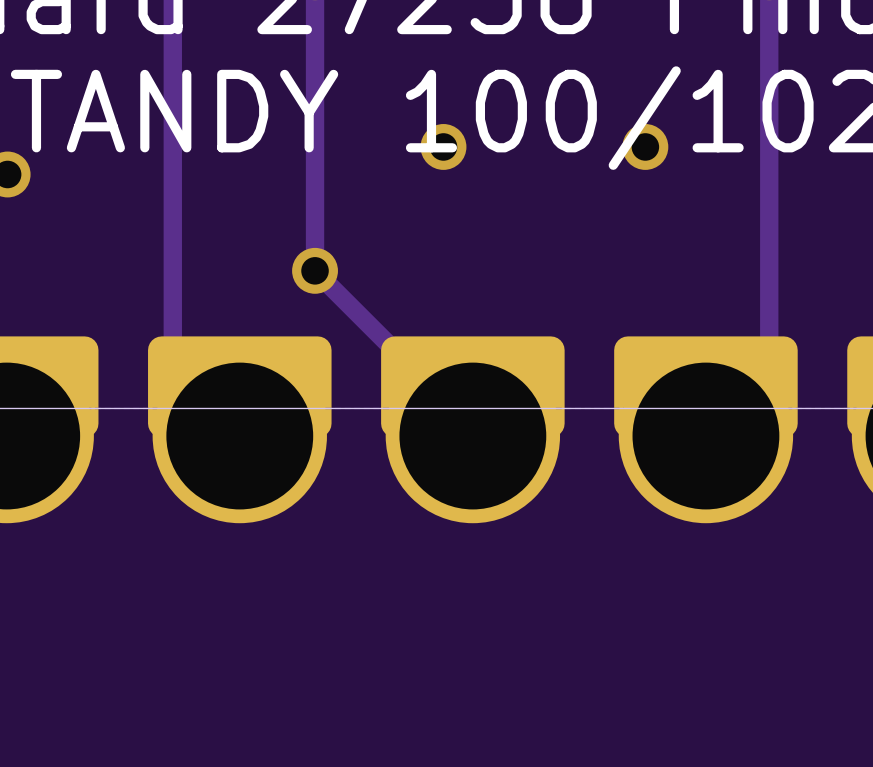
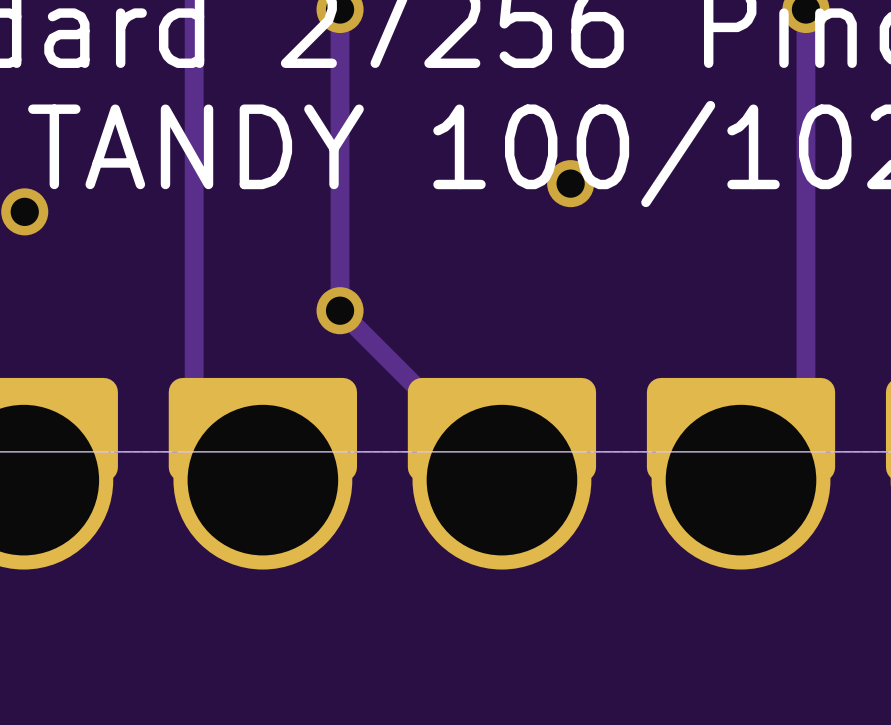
via: (443, 146) -> none
via: none -> (570, 183)
via: (645, 146) -> none

